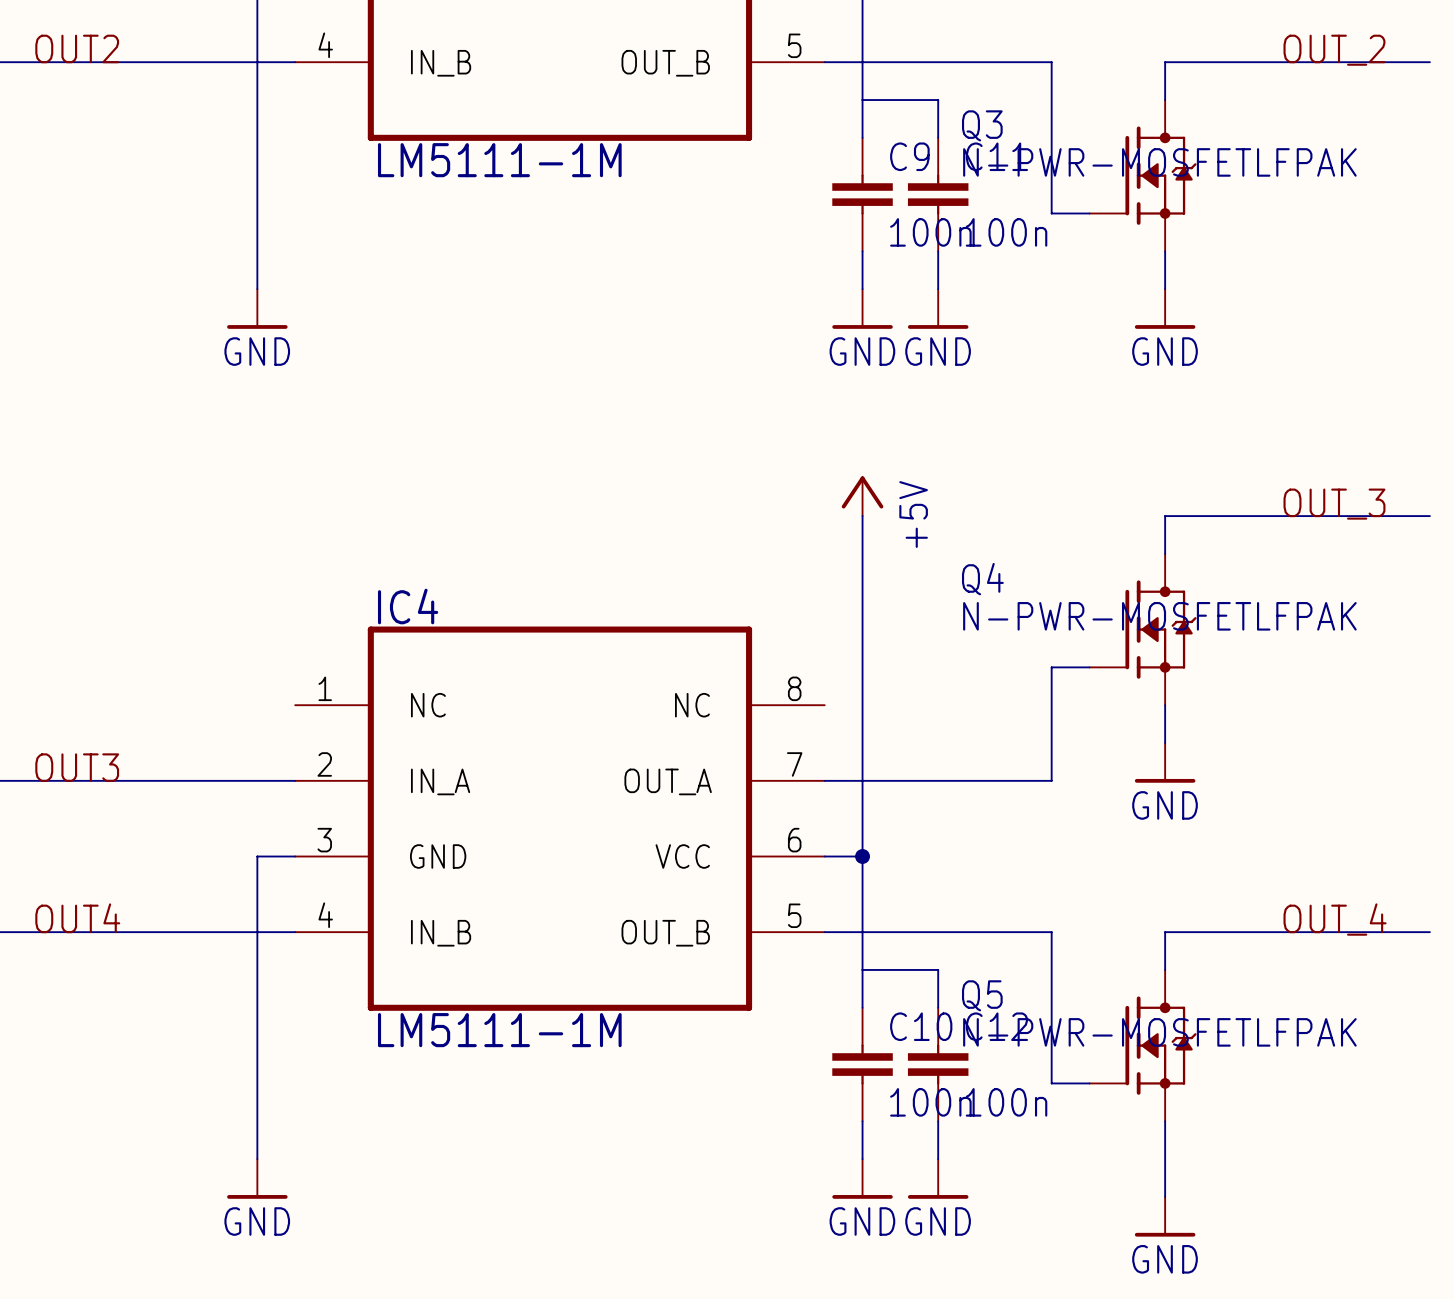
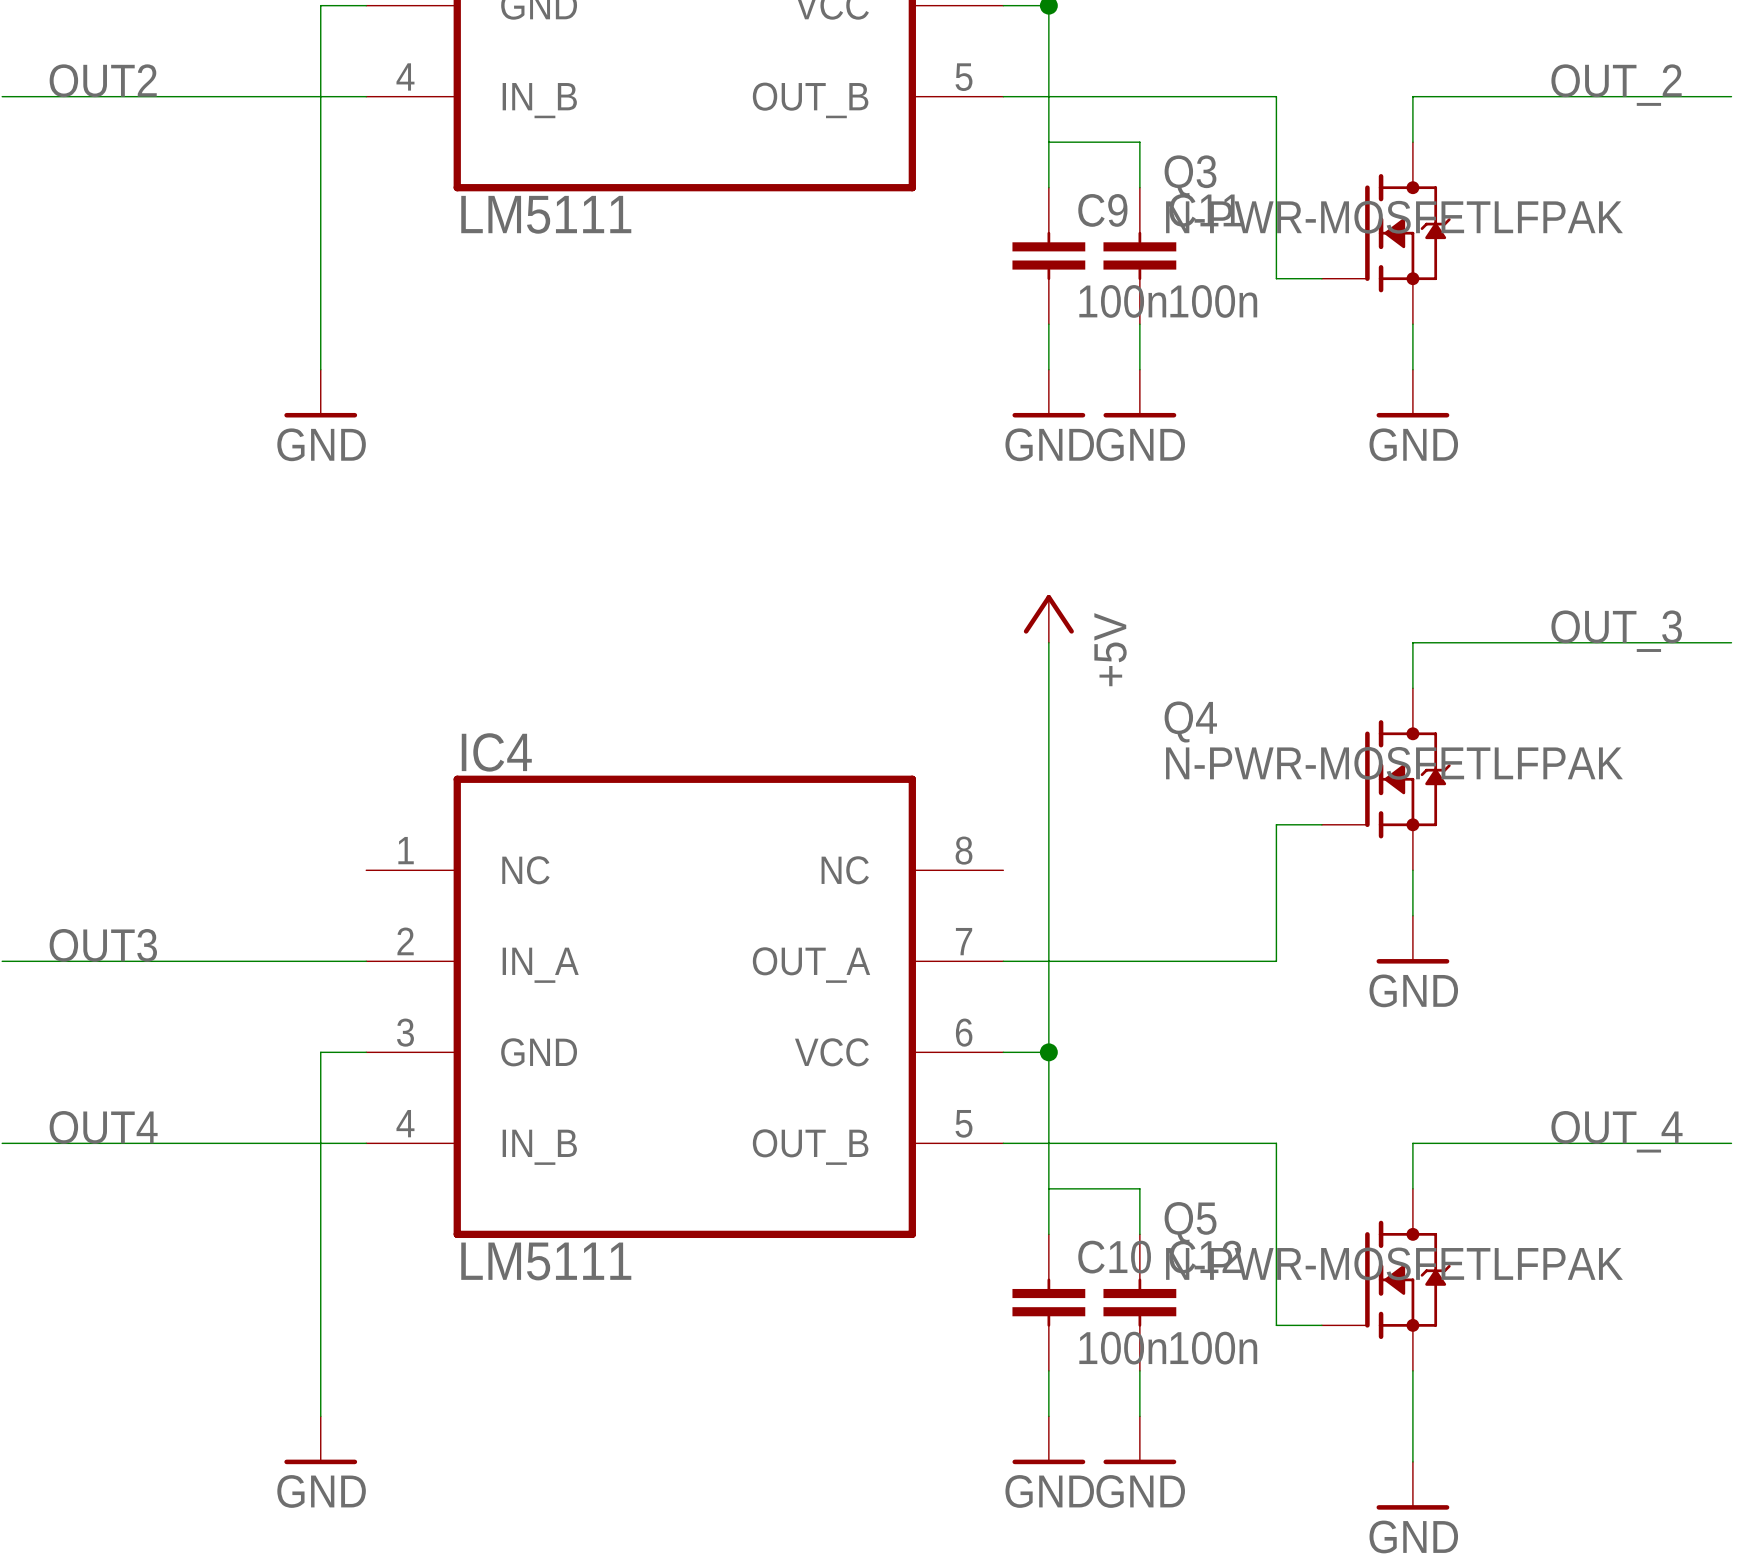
part value: LM5111-1M (499, 160) -> LM5111 (546, 214)
IC4 value: LM5111-1M (499, 1030) -> LM5111 (546, 1261)

